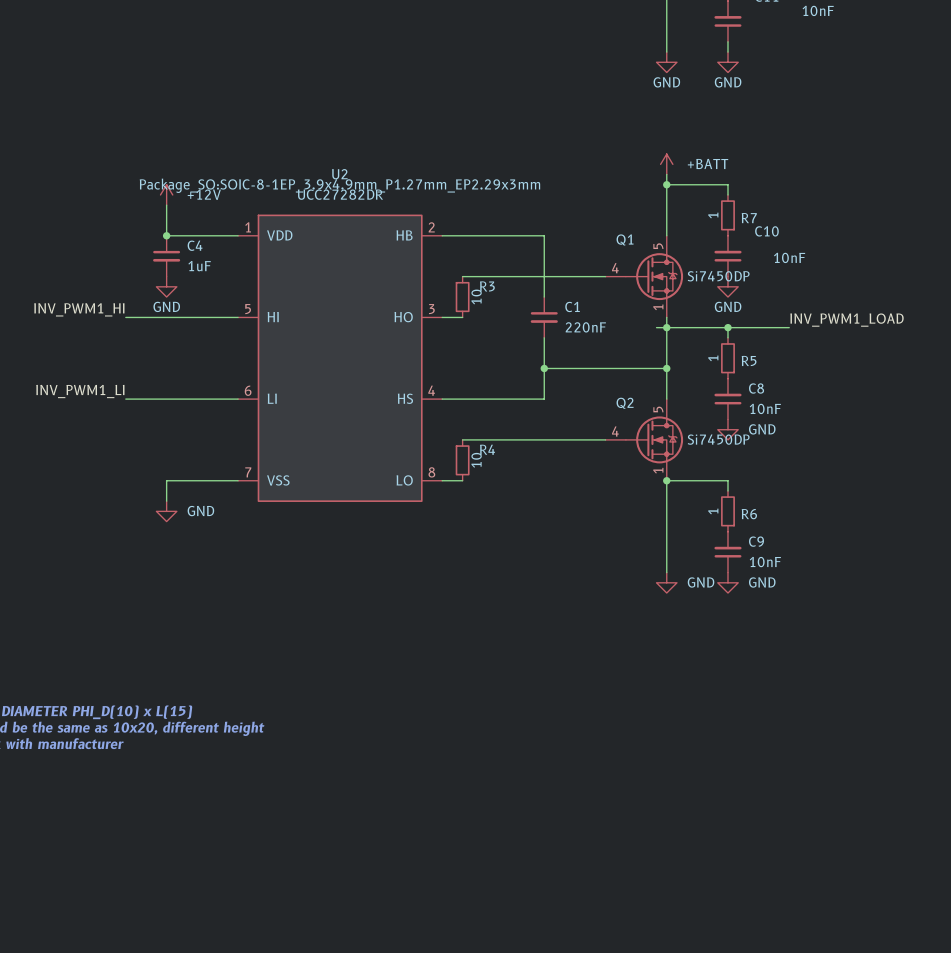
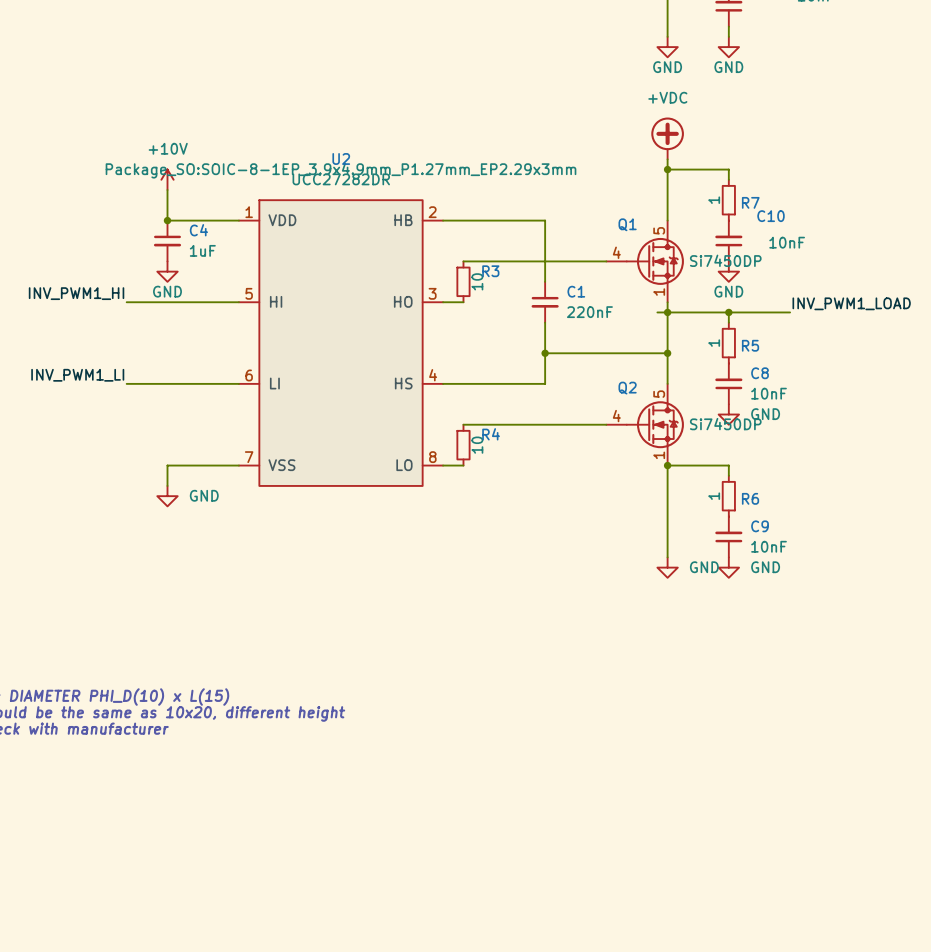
power symbol: none -> +VDC (667, 138)
power symbol: +BATT (666, 164) -> none
power symbol: +12V (166, 194) -> +10V (167, 179)

